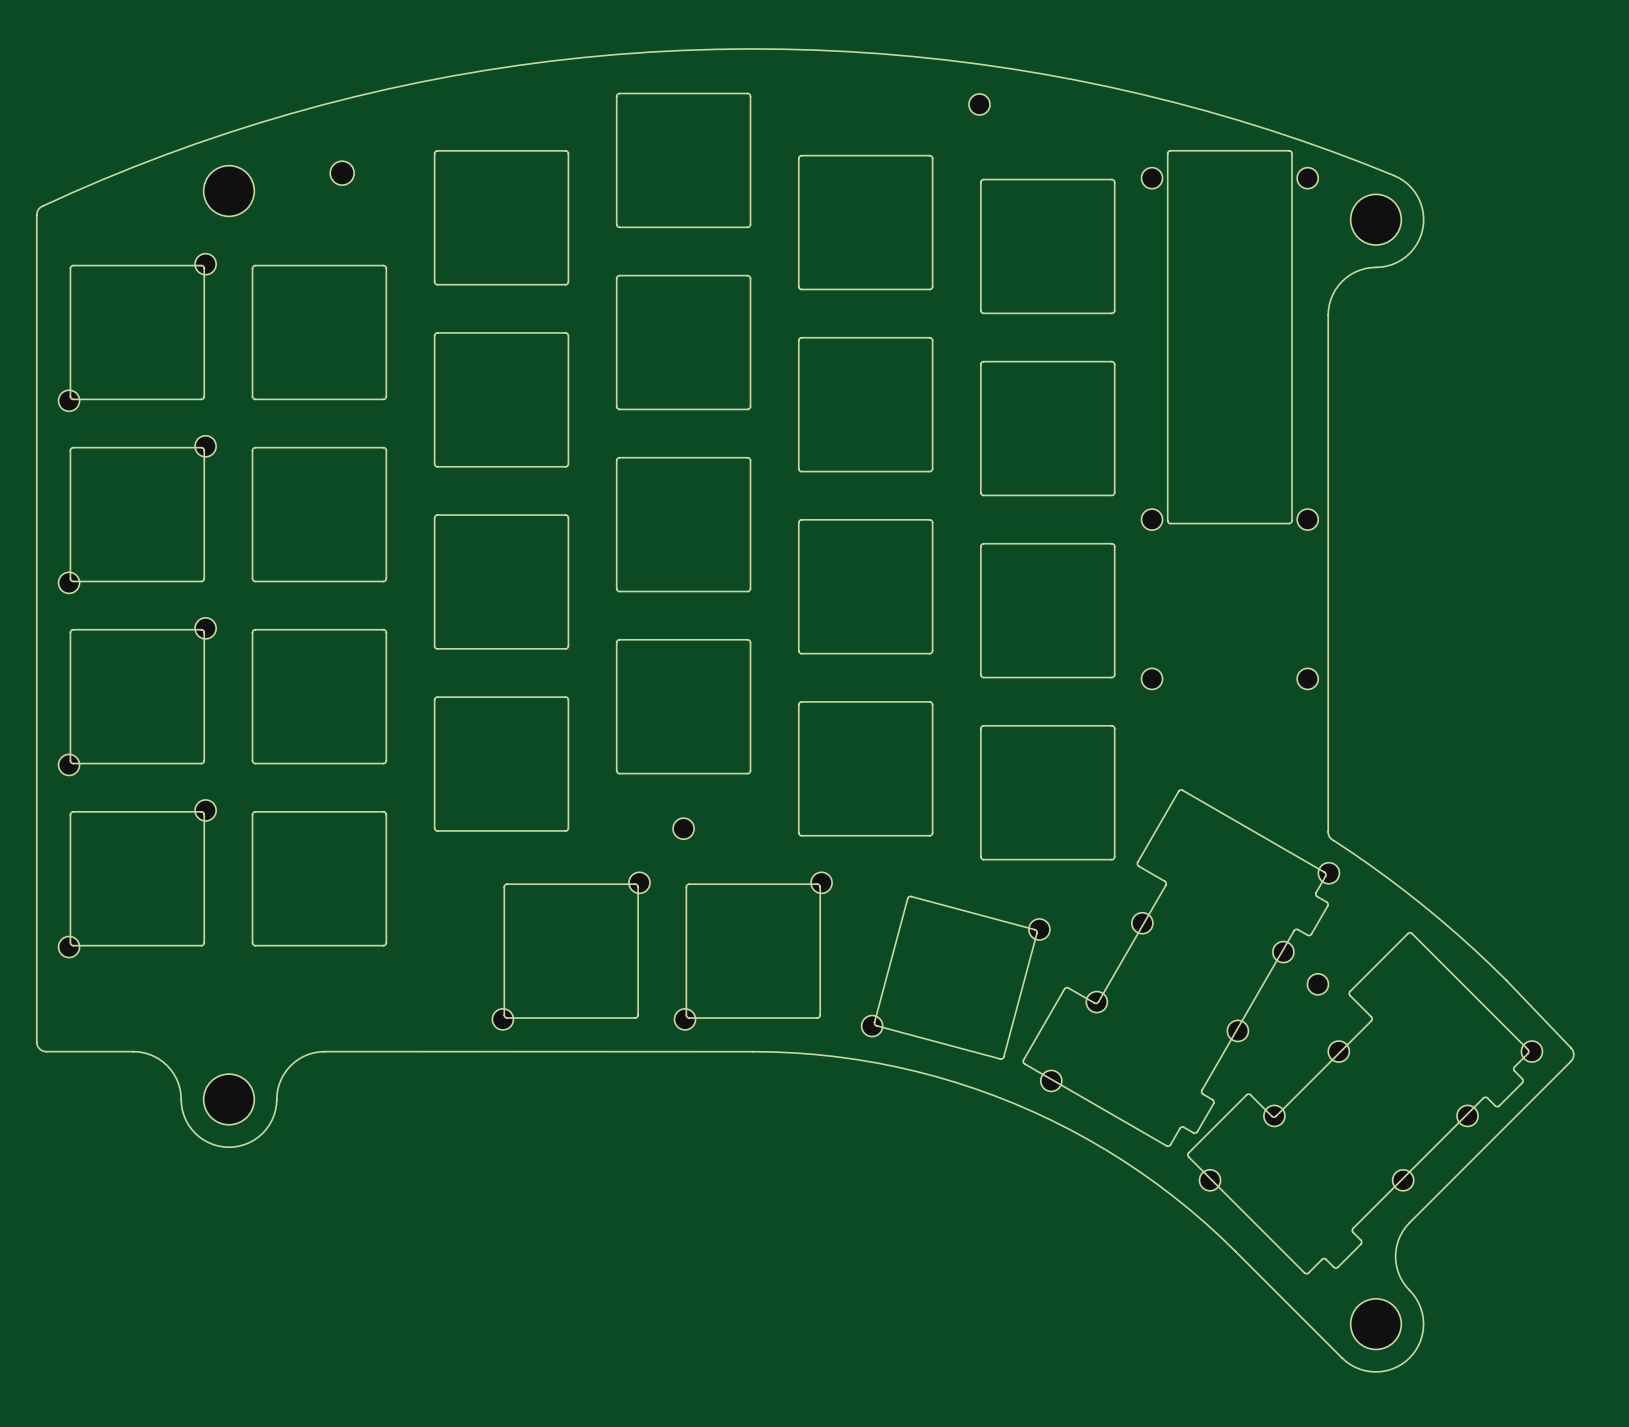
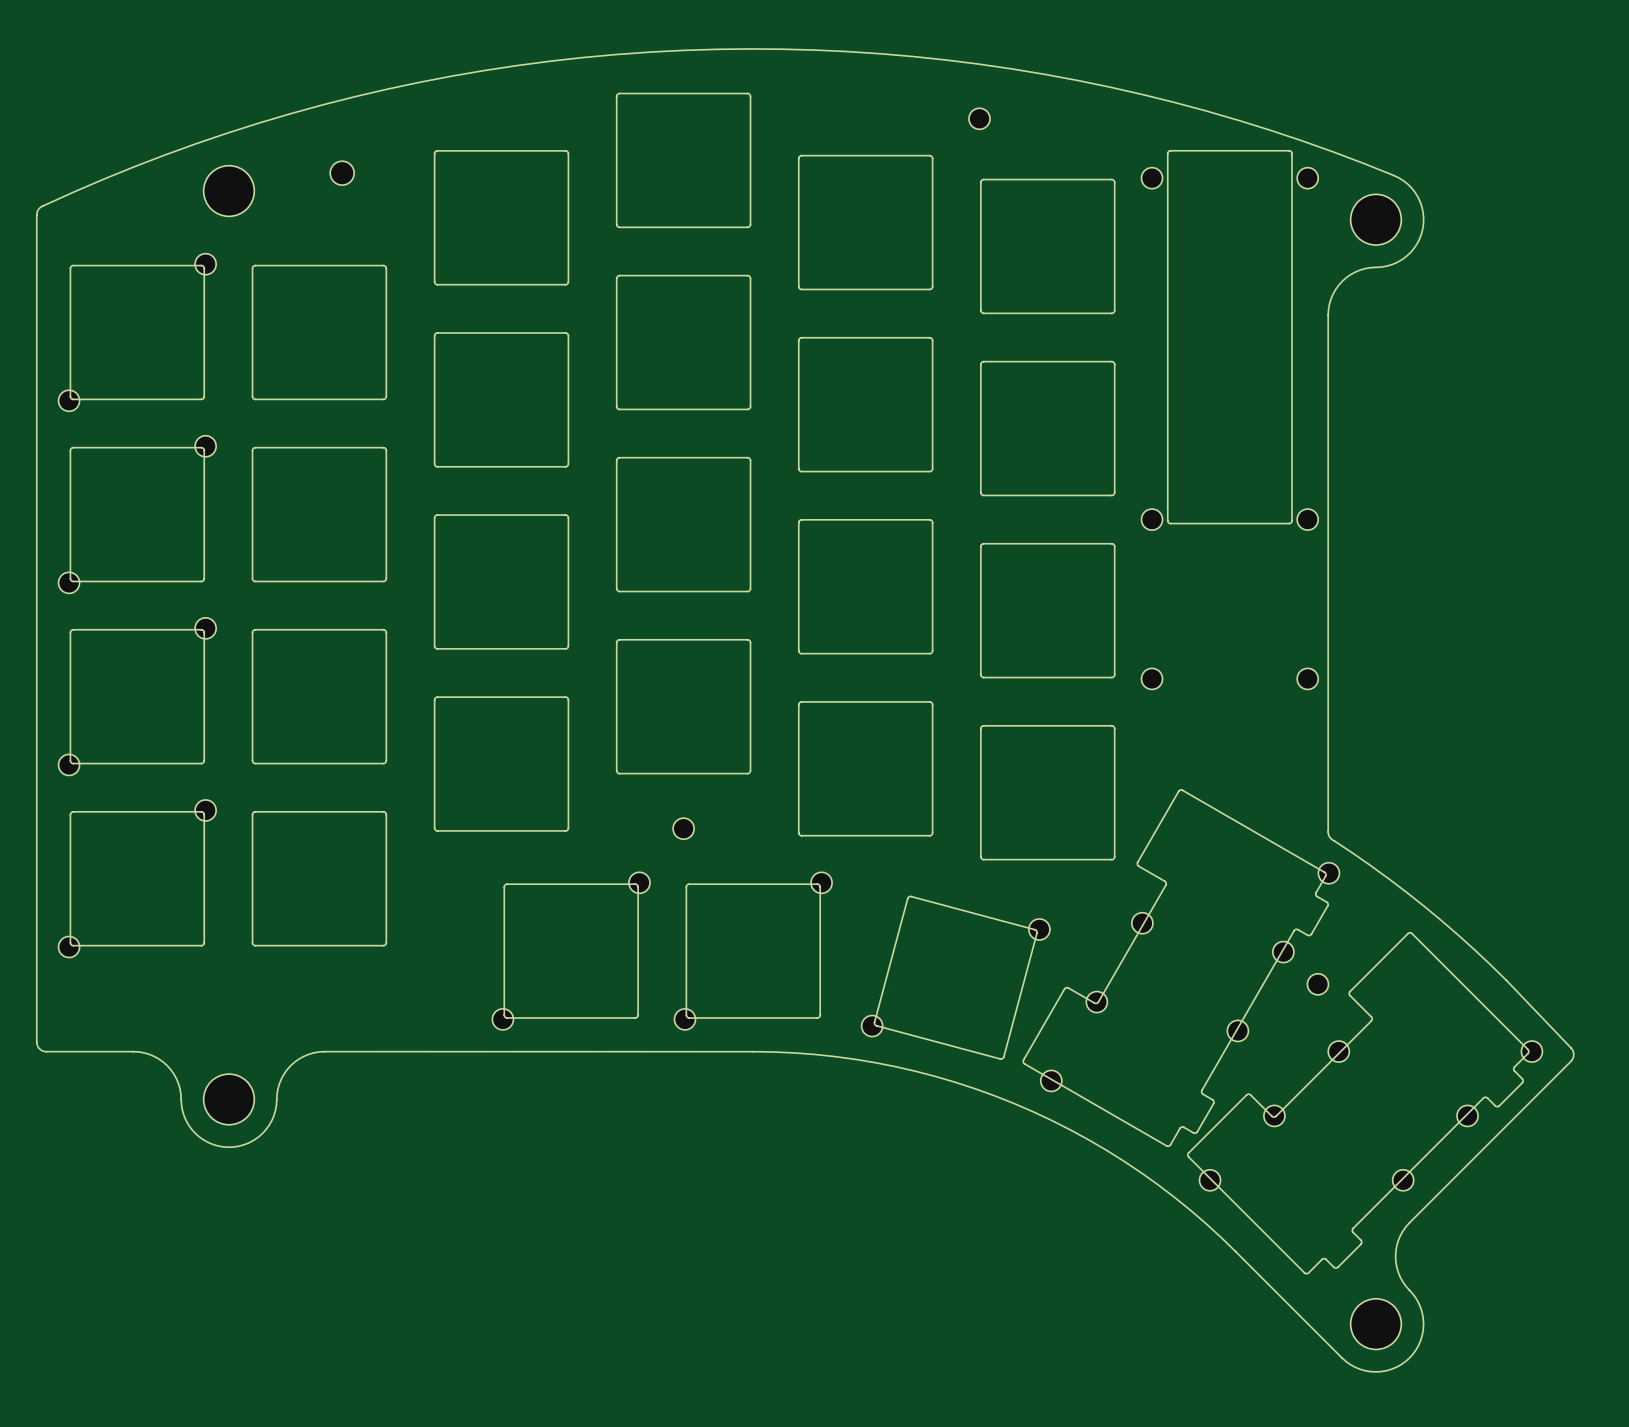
part position: (979, 104) -> (979, 118)

